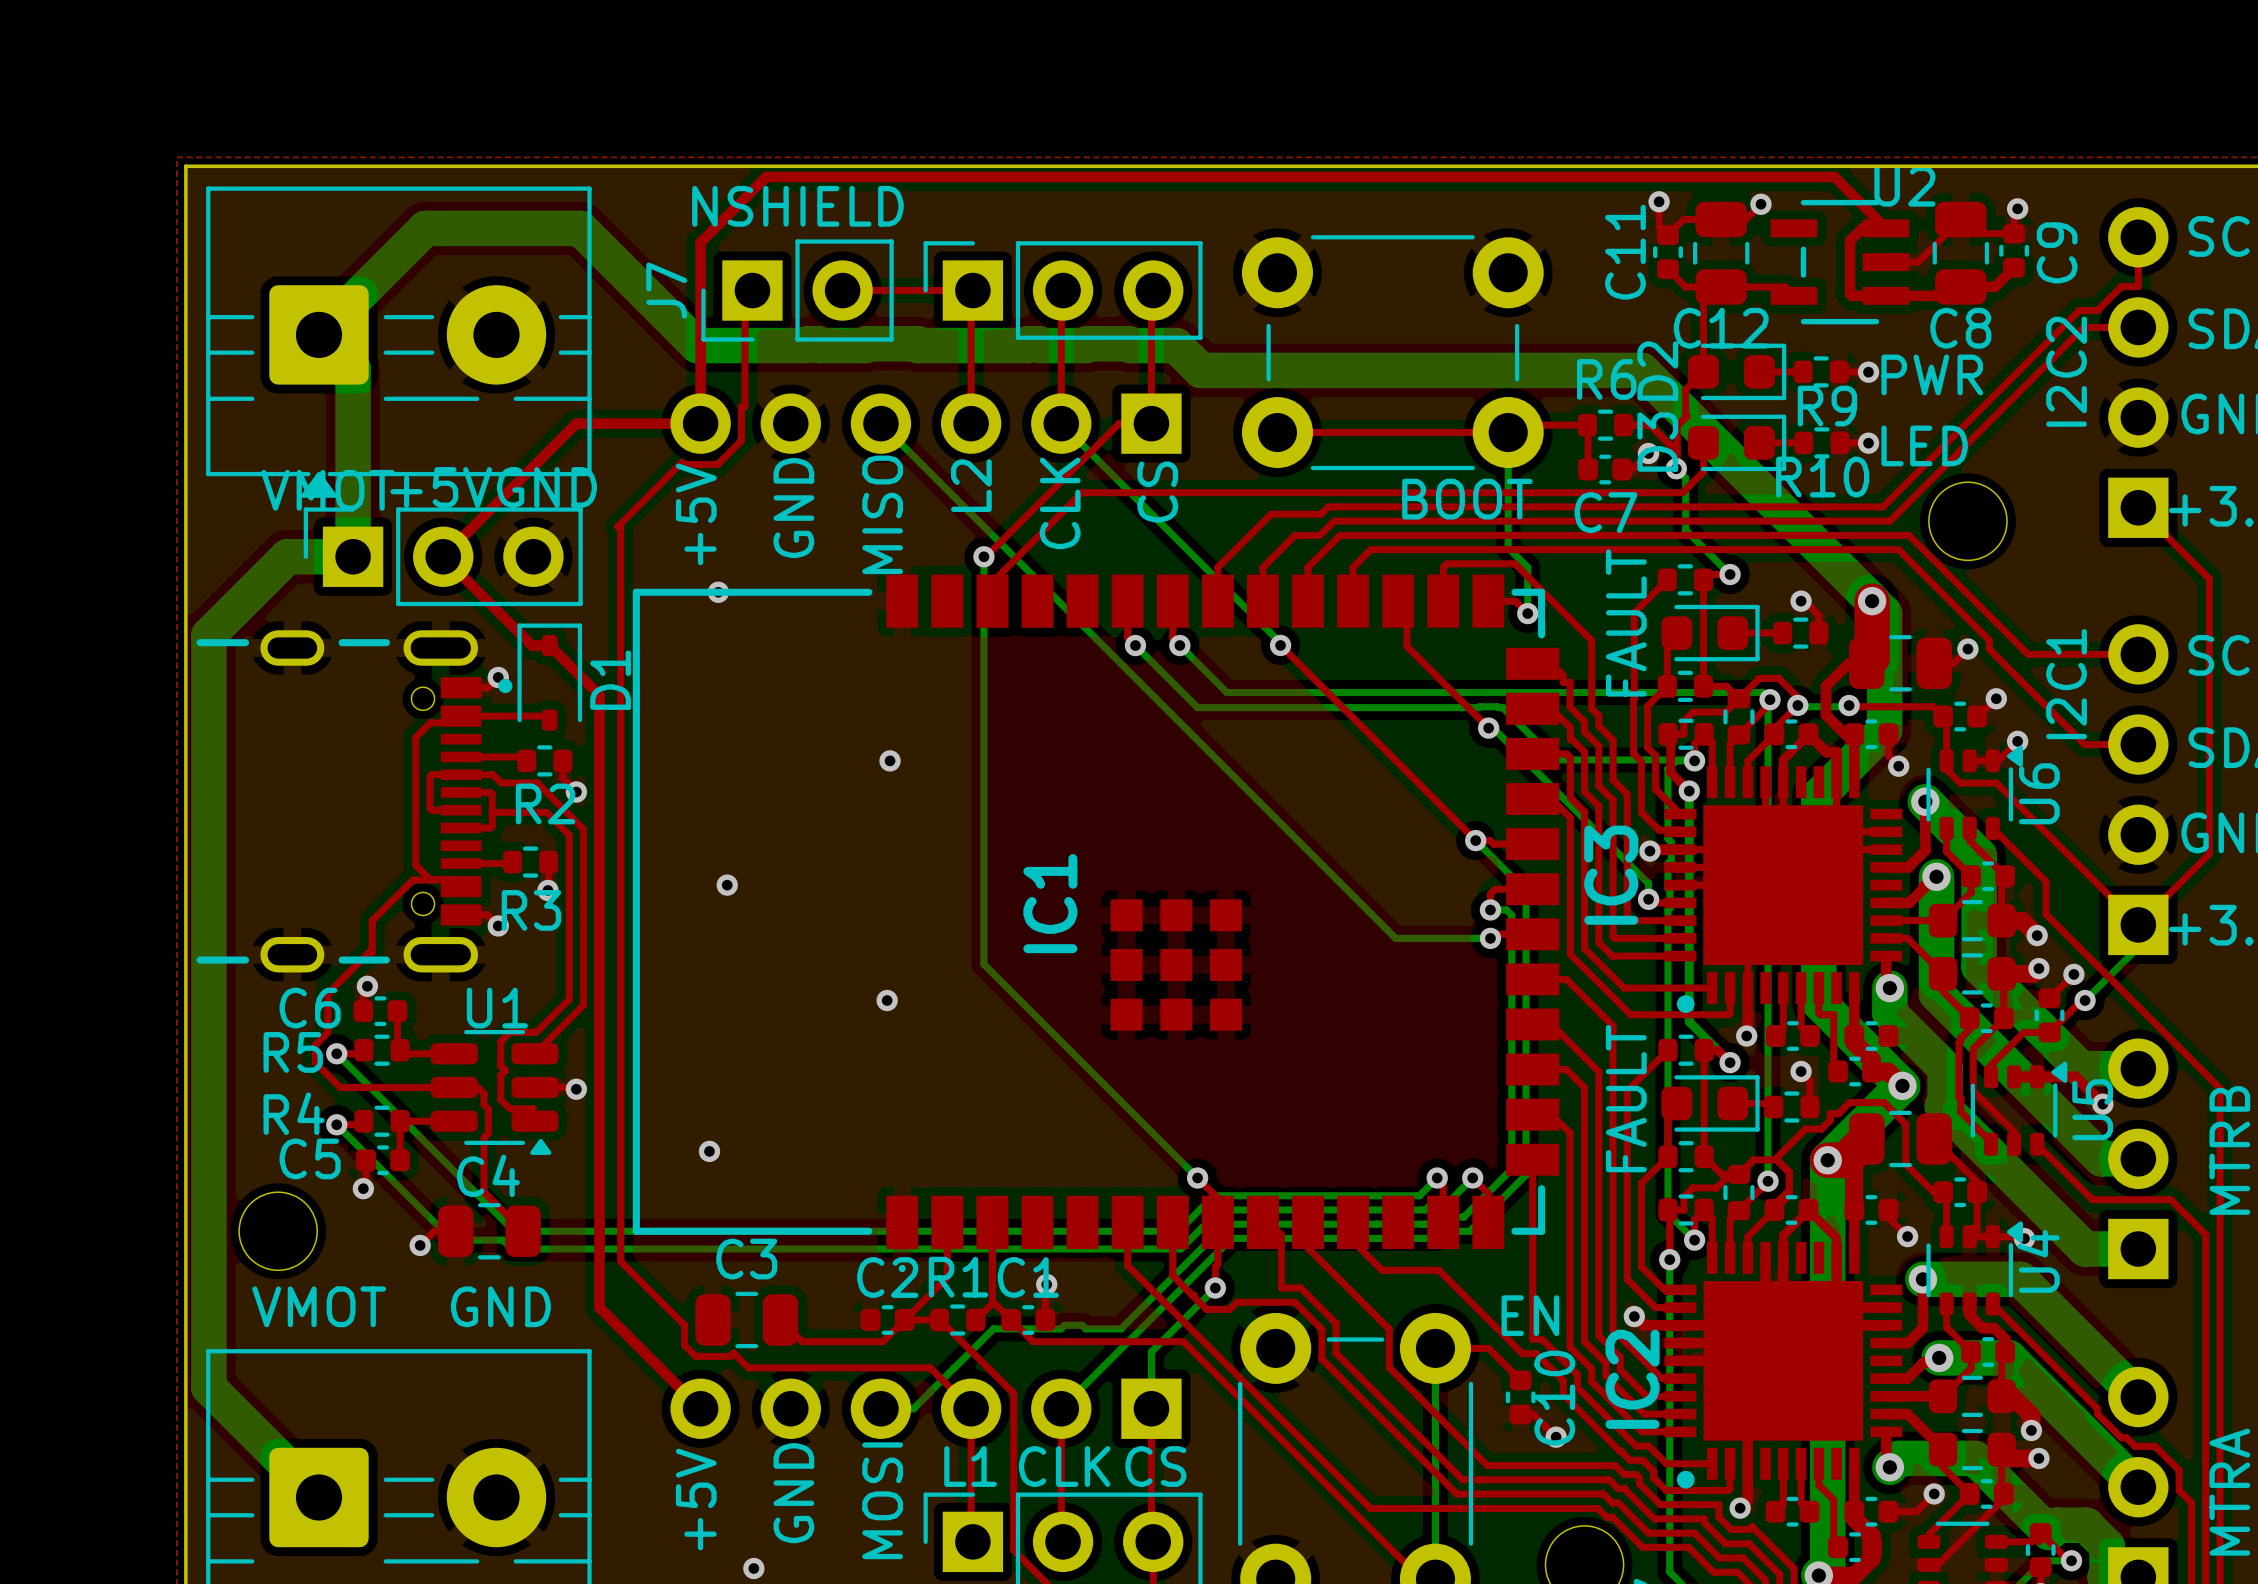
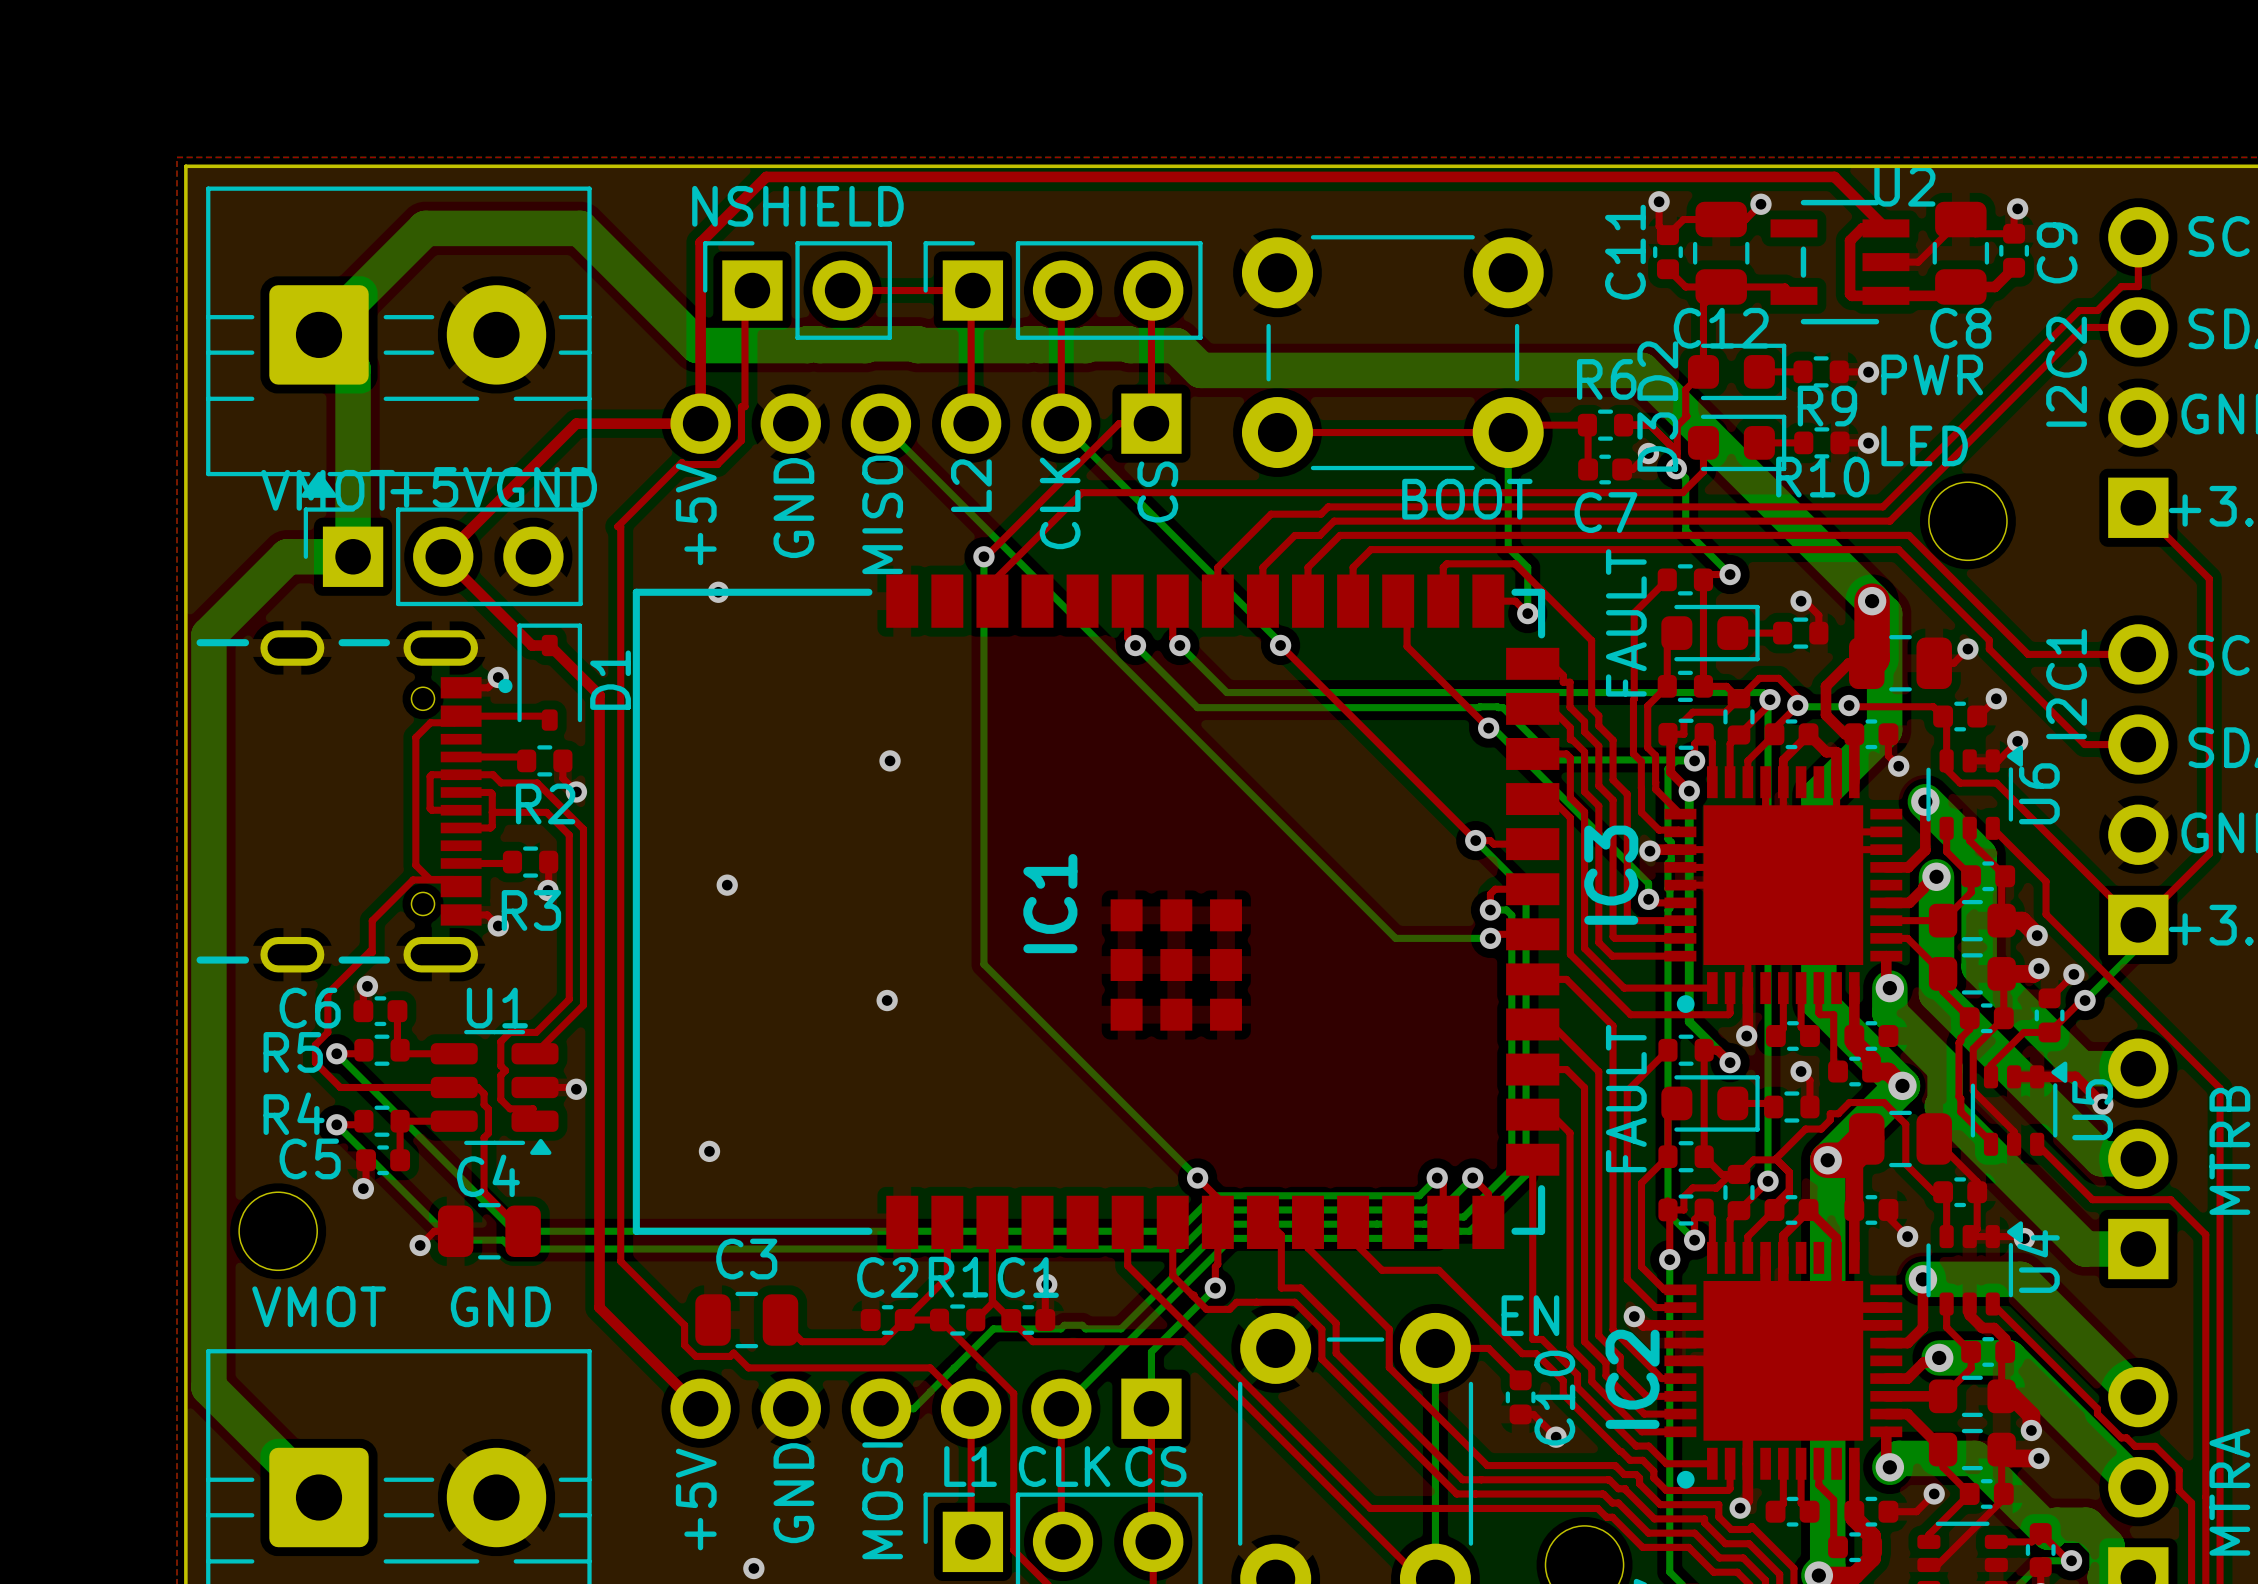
J7: (797, 290) -> none
part: none -> (797, 290)

